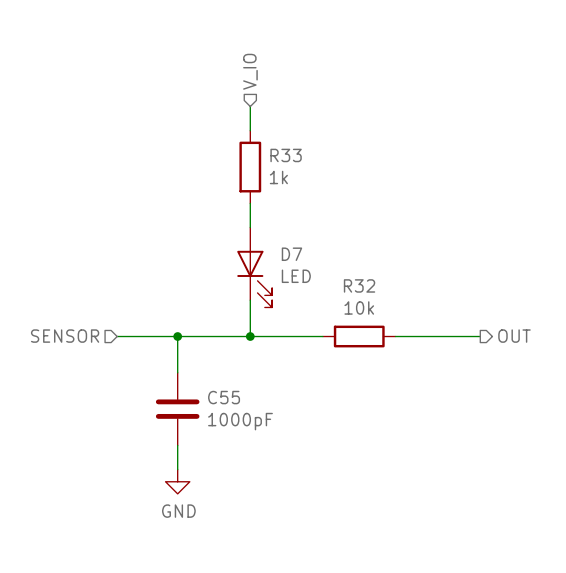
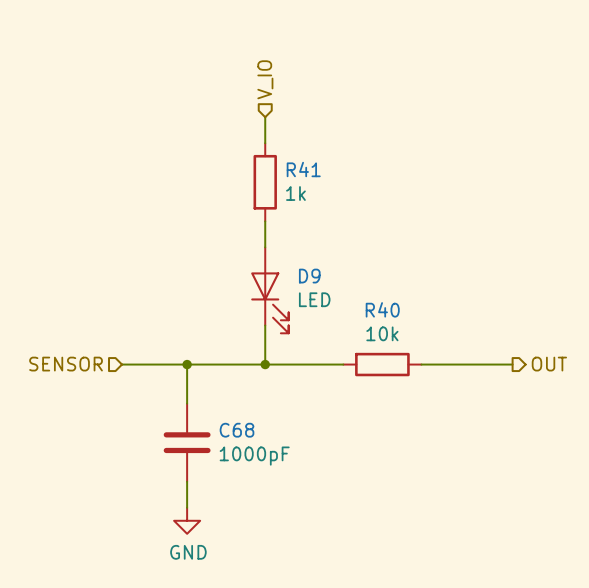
R33 name: R33 (286, 155) -> R41 (303, 169)
D7 name: D7 (291, 254) -> D9 (309, 276)
R32 name: R32 (359, 285) -> R40 (382, 309)
C55 name: C55 (224, 397) -> C68 (237, 430)

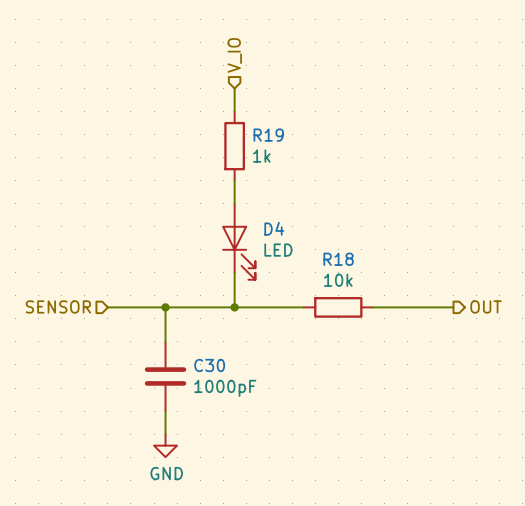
R41 name: R41 (303, 169) -> R19 (268, 135)
D9 name: D9 (309, 276) -> D4 (274, 228)
R40 name: R40 (382, 309) -> R18 (338, 259)
C68 name: C68 (237, 430) -> C30 (209, 365)

